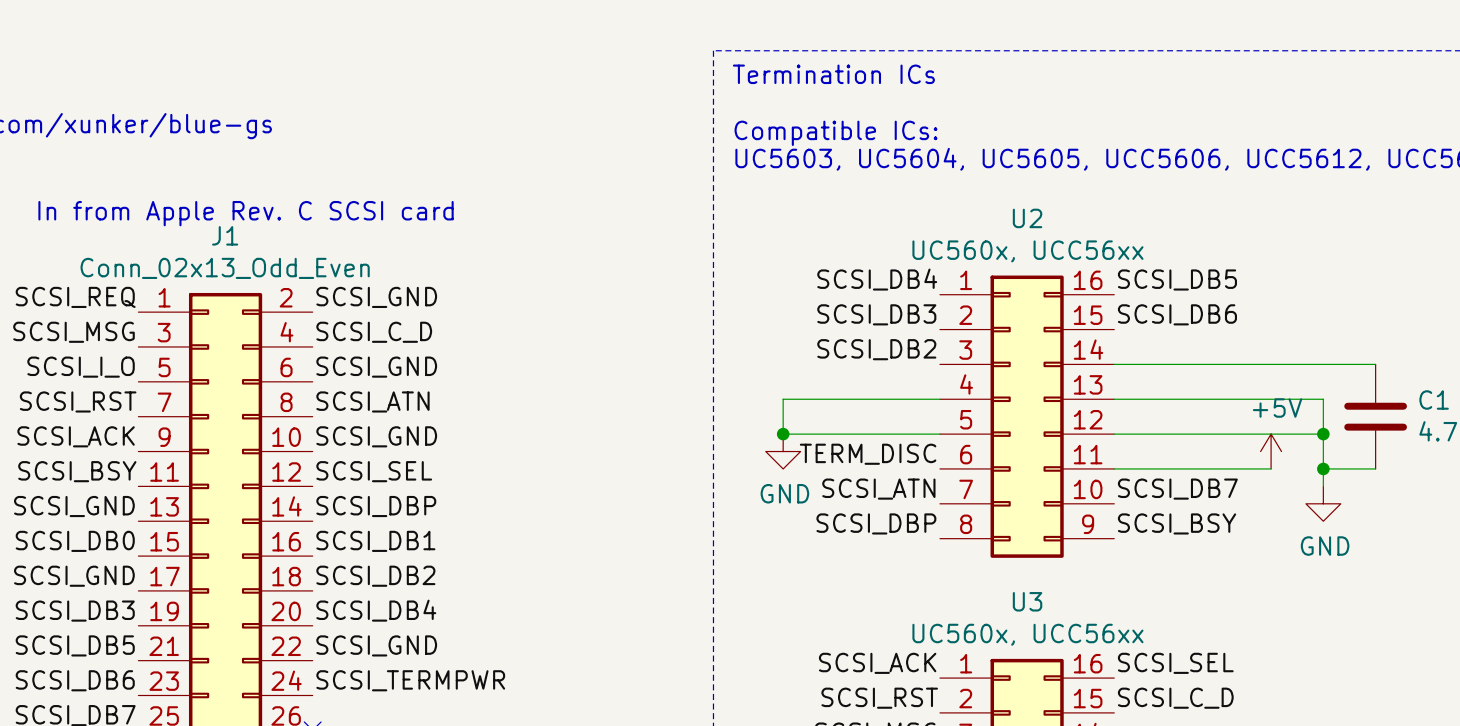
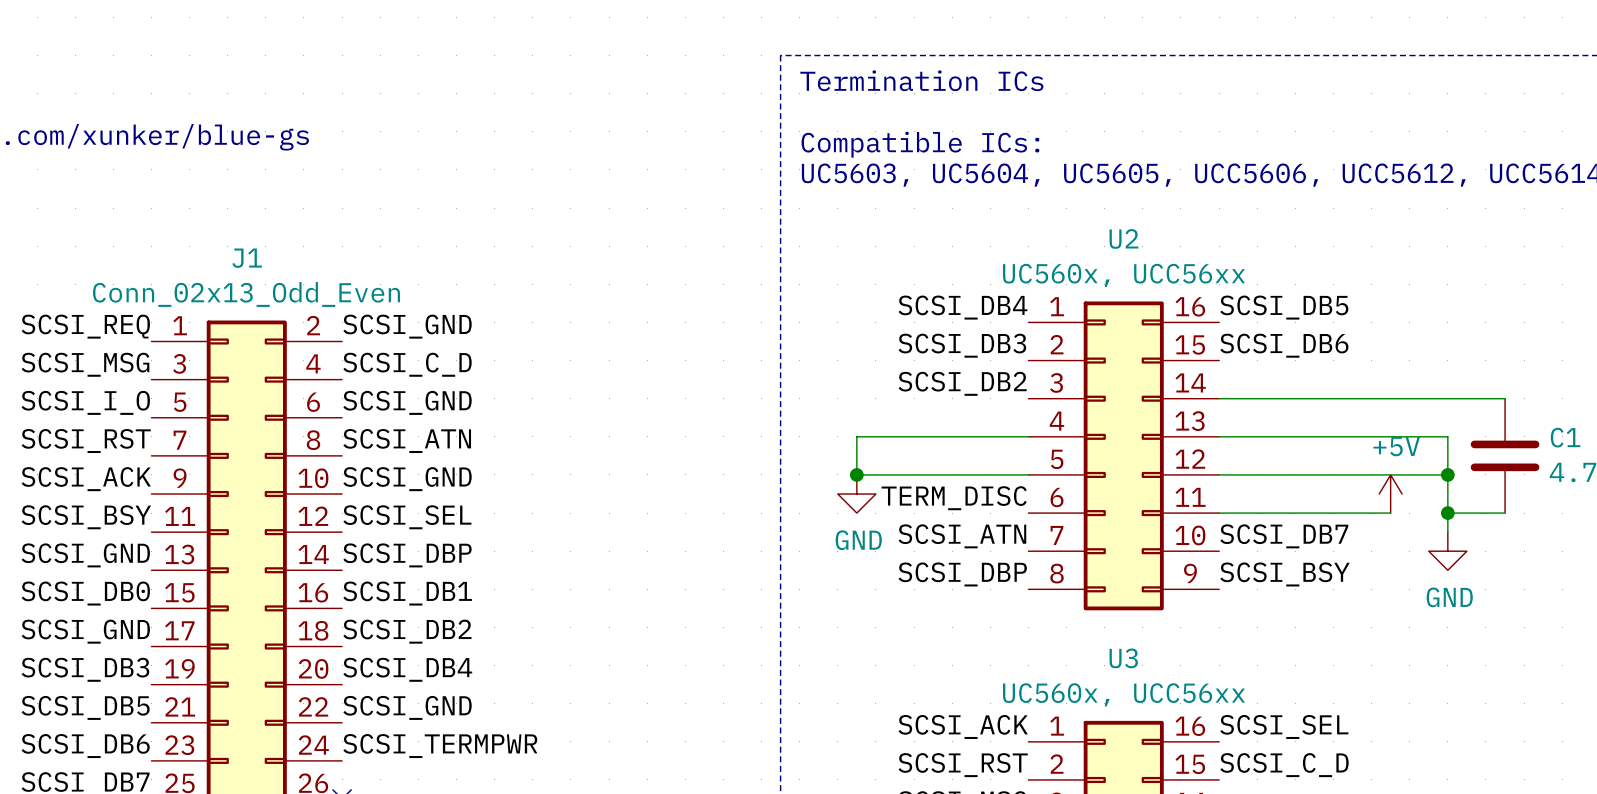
text: In from Apple Rev. C SCSI card (246, 213) -> none

